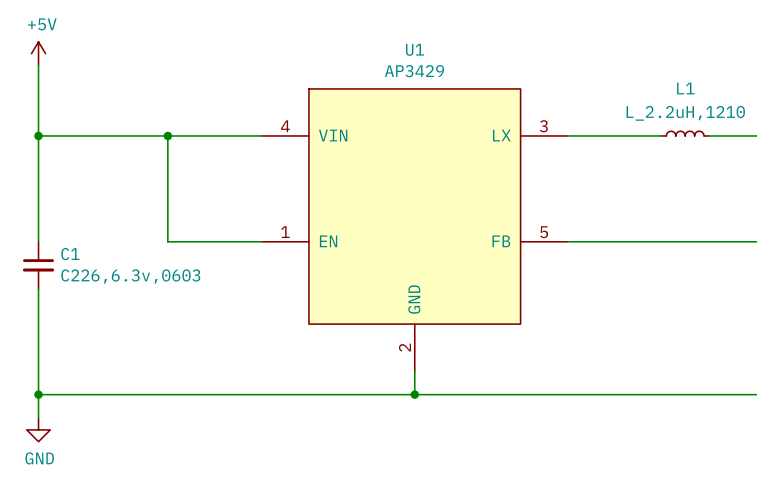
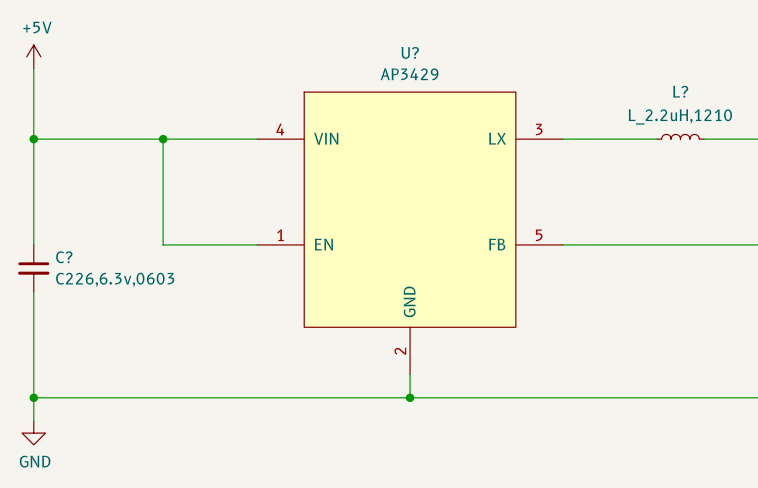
U1 name: U1 (415, 49) -> U? (410, 52)
L1 name: L1 (685, 88) -> L? (680, 91)
C1 name: C1 (70, 254) -> C? (64, 257)

